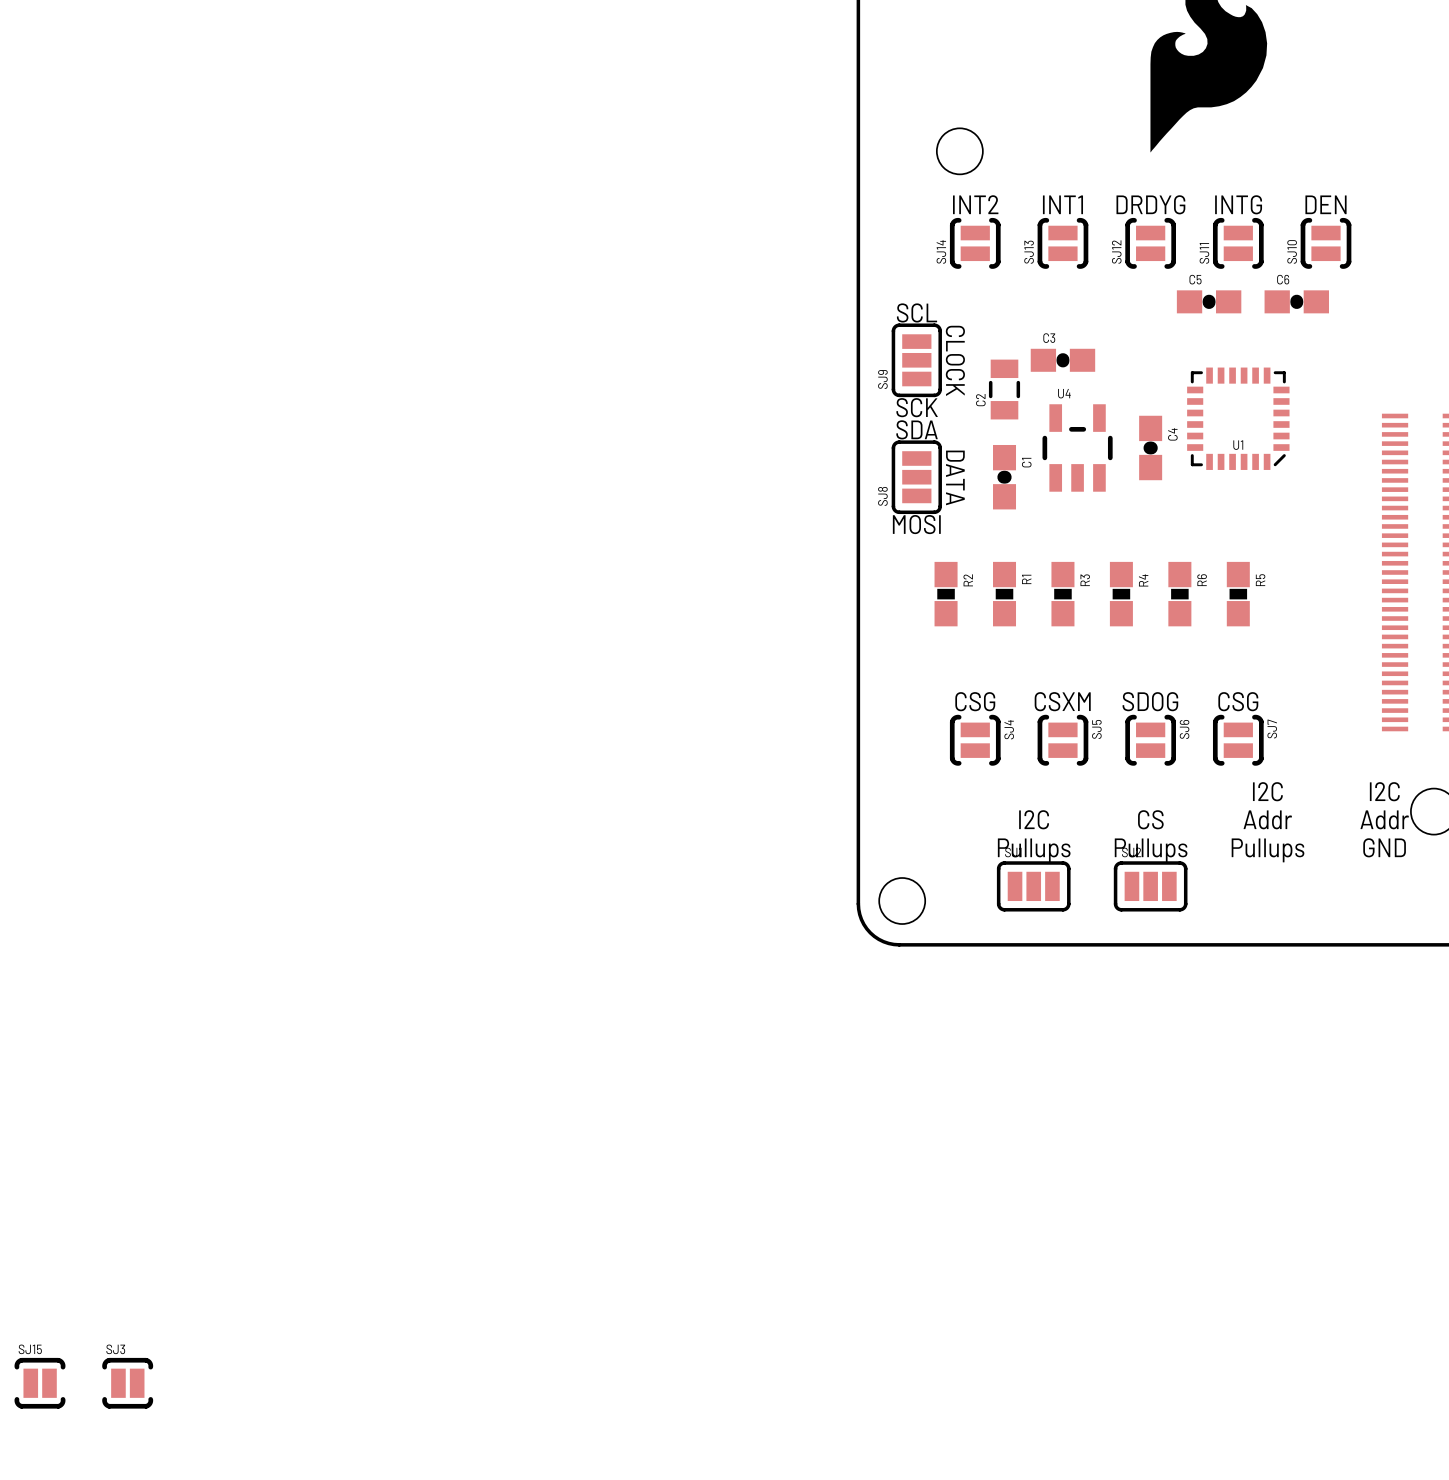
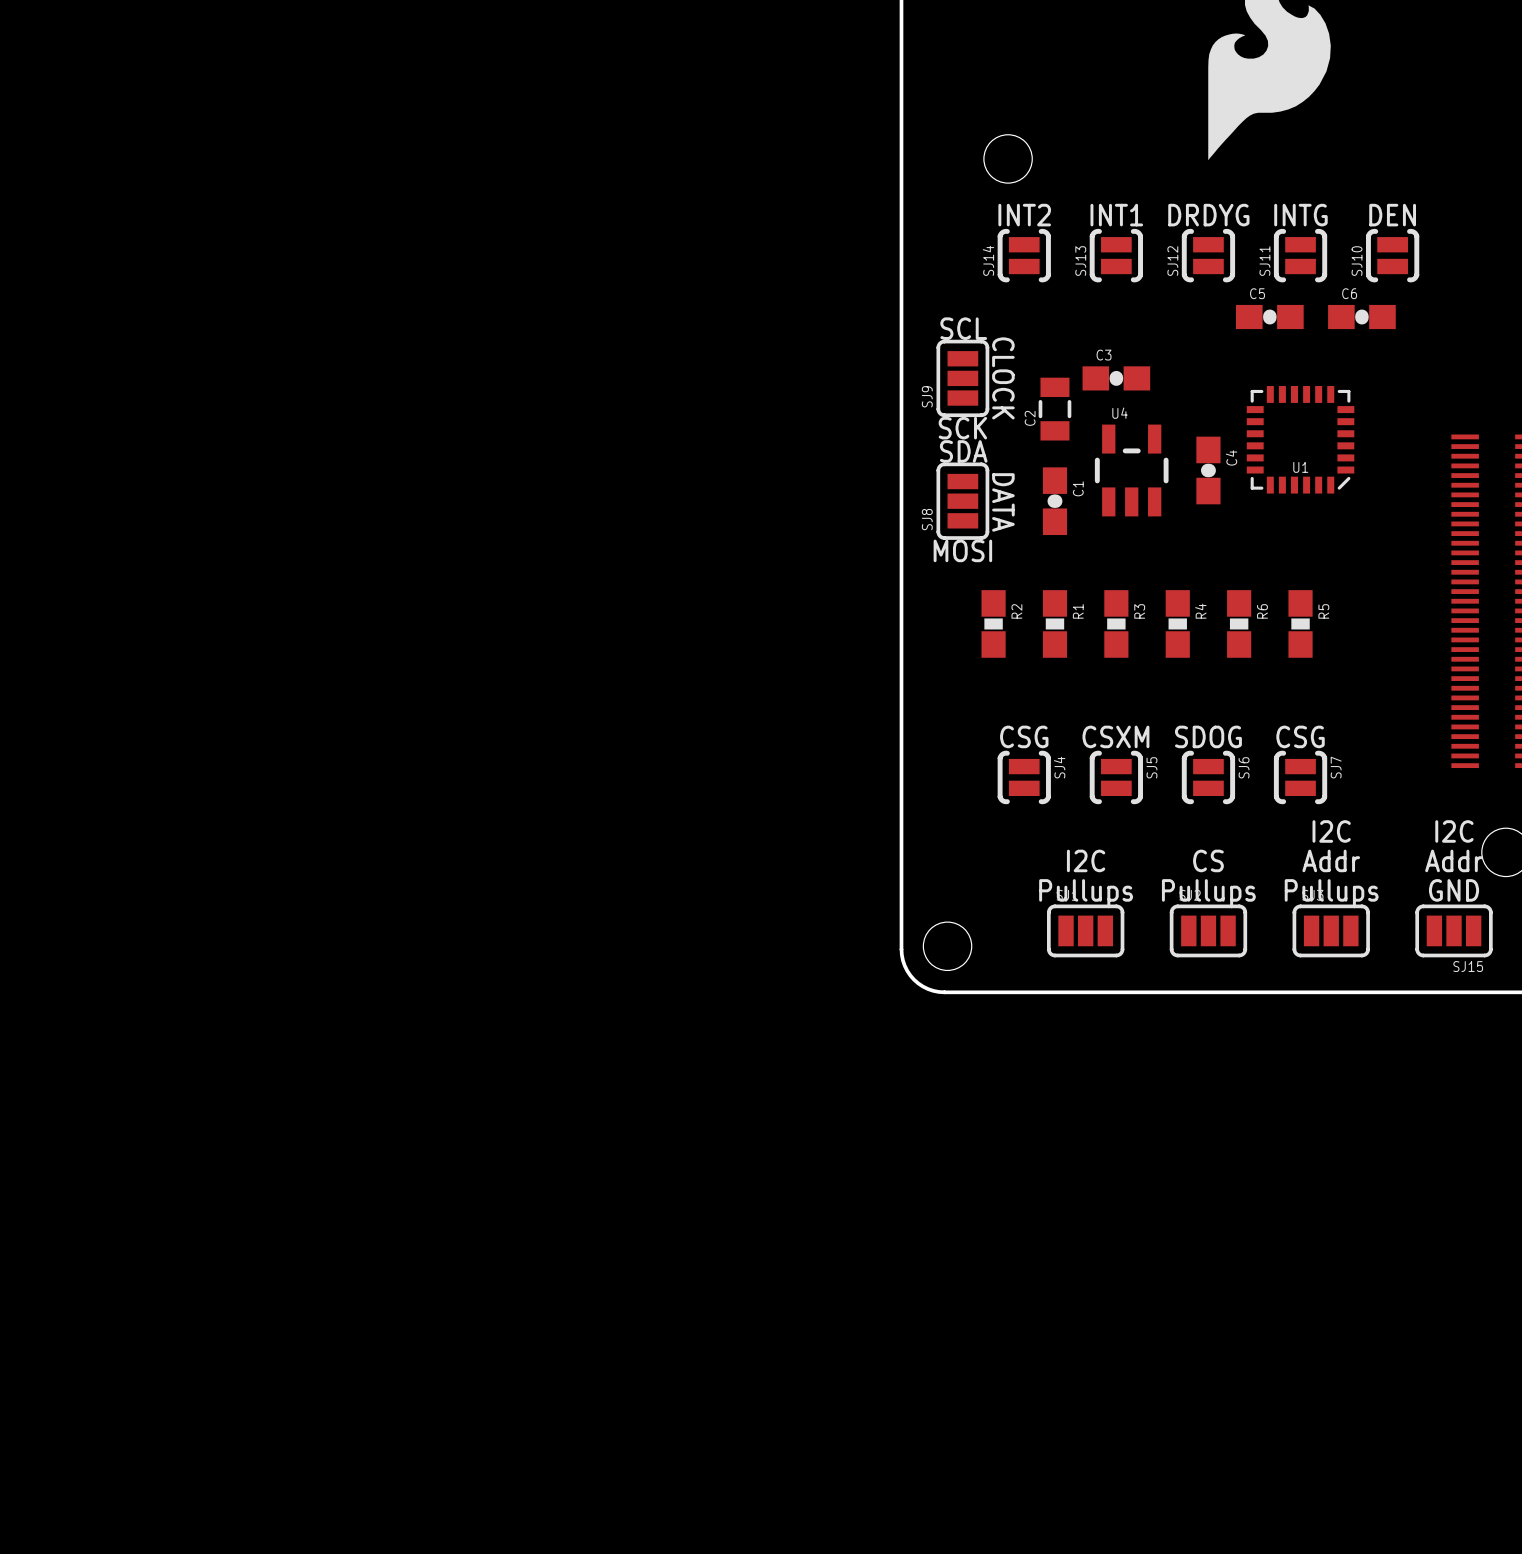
SJ15 name position: SJ15 (30, 1349) -> SJ15 (1468, 966)
SJ15 footprint: [14, 1357, 66, 1409] -> [1415, 904, 1493, 958]
SJ3 footprint: [102, 1357, 154, 1409] -> [1292, 904, 1370, 958]

